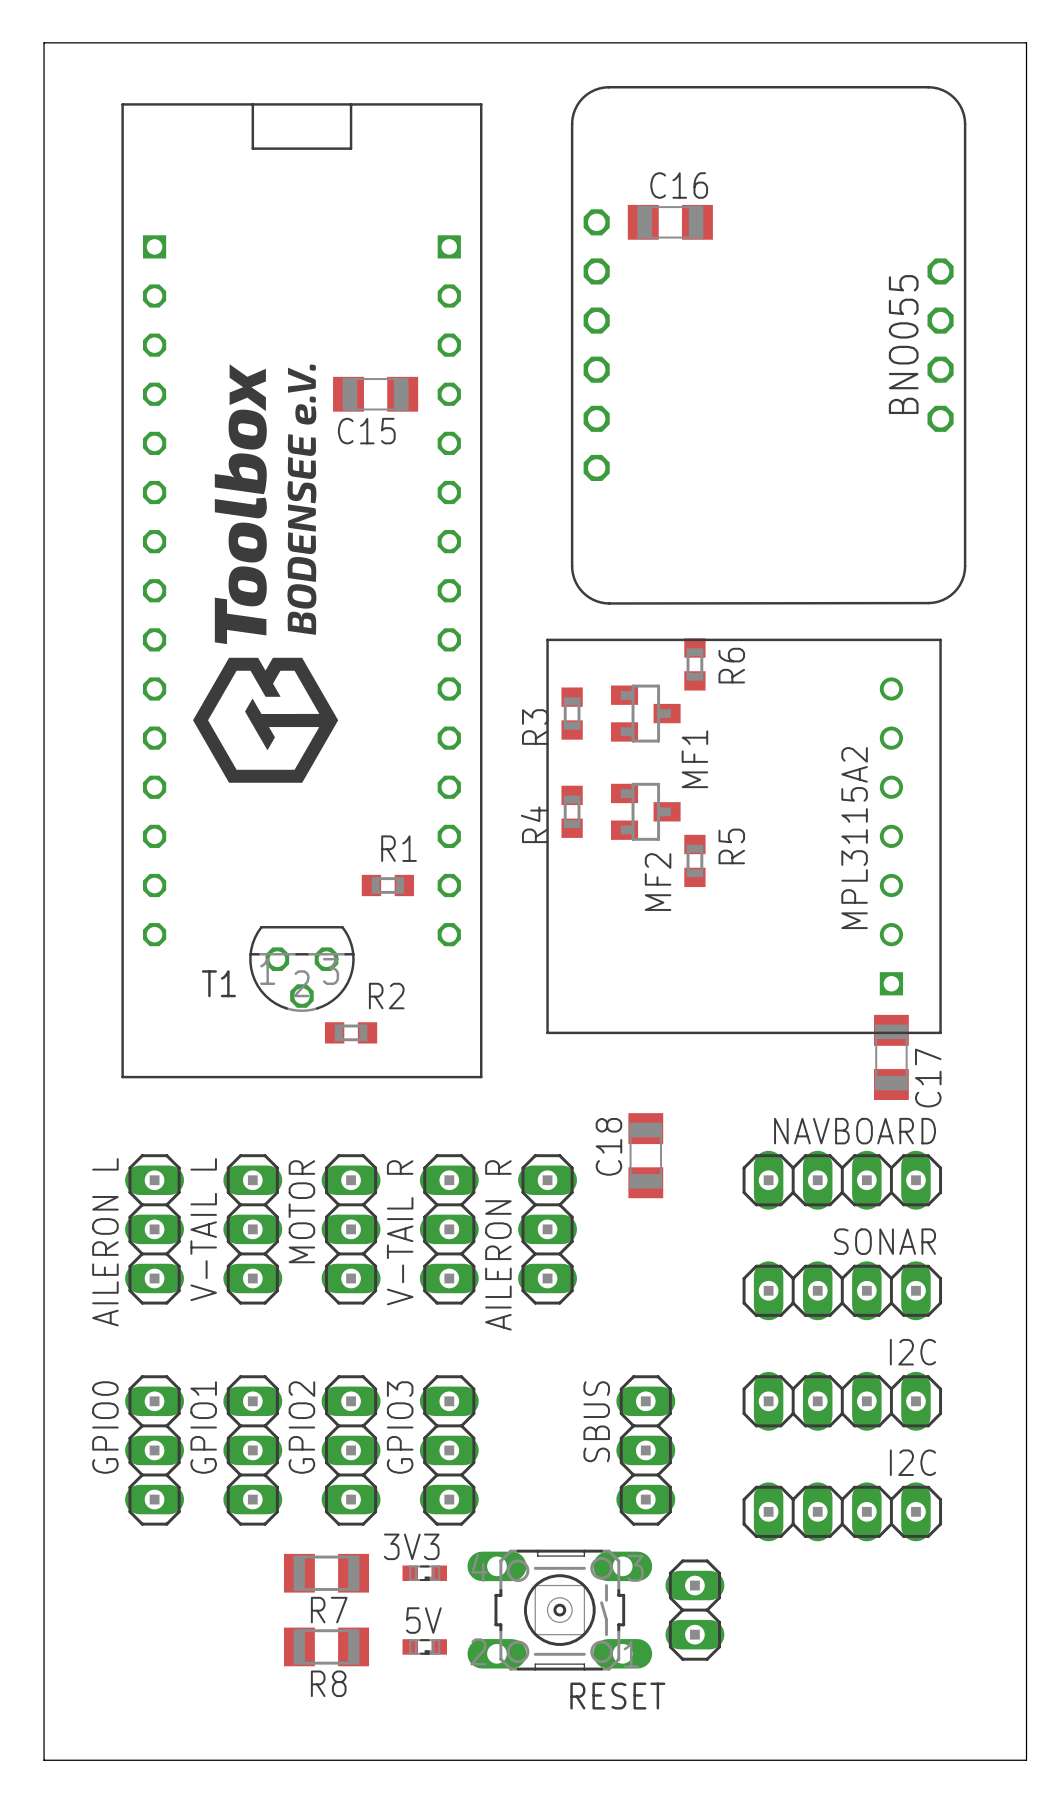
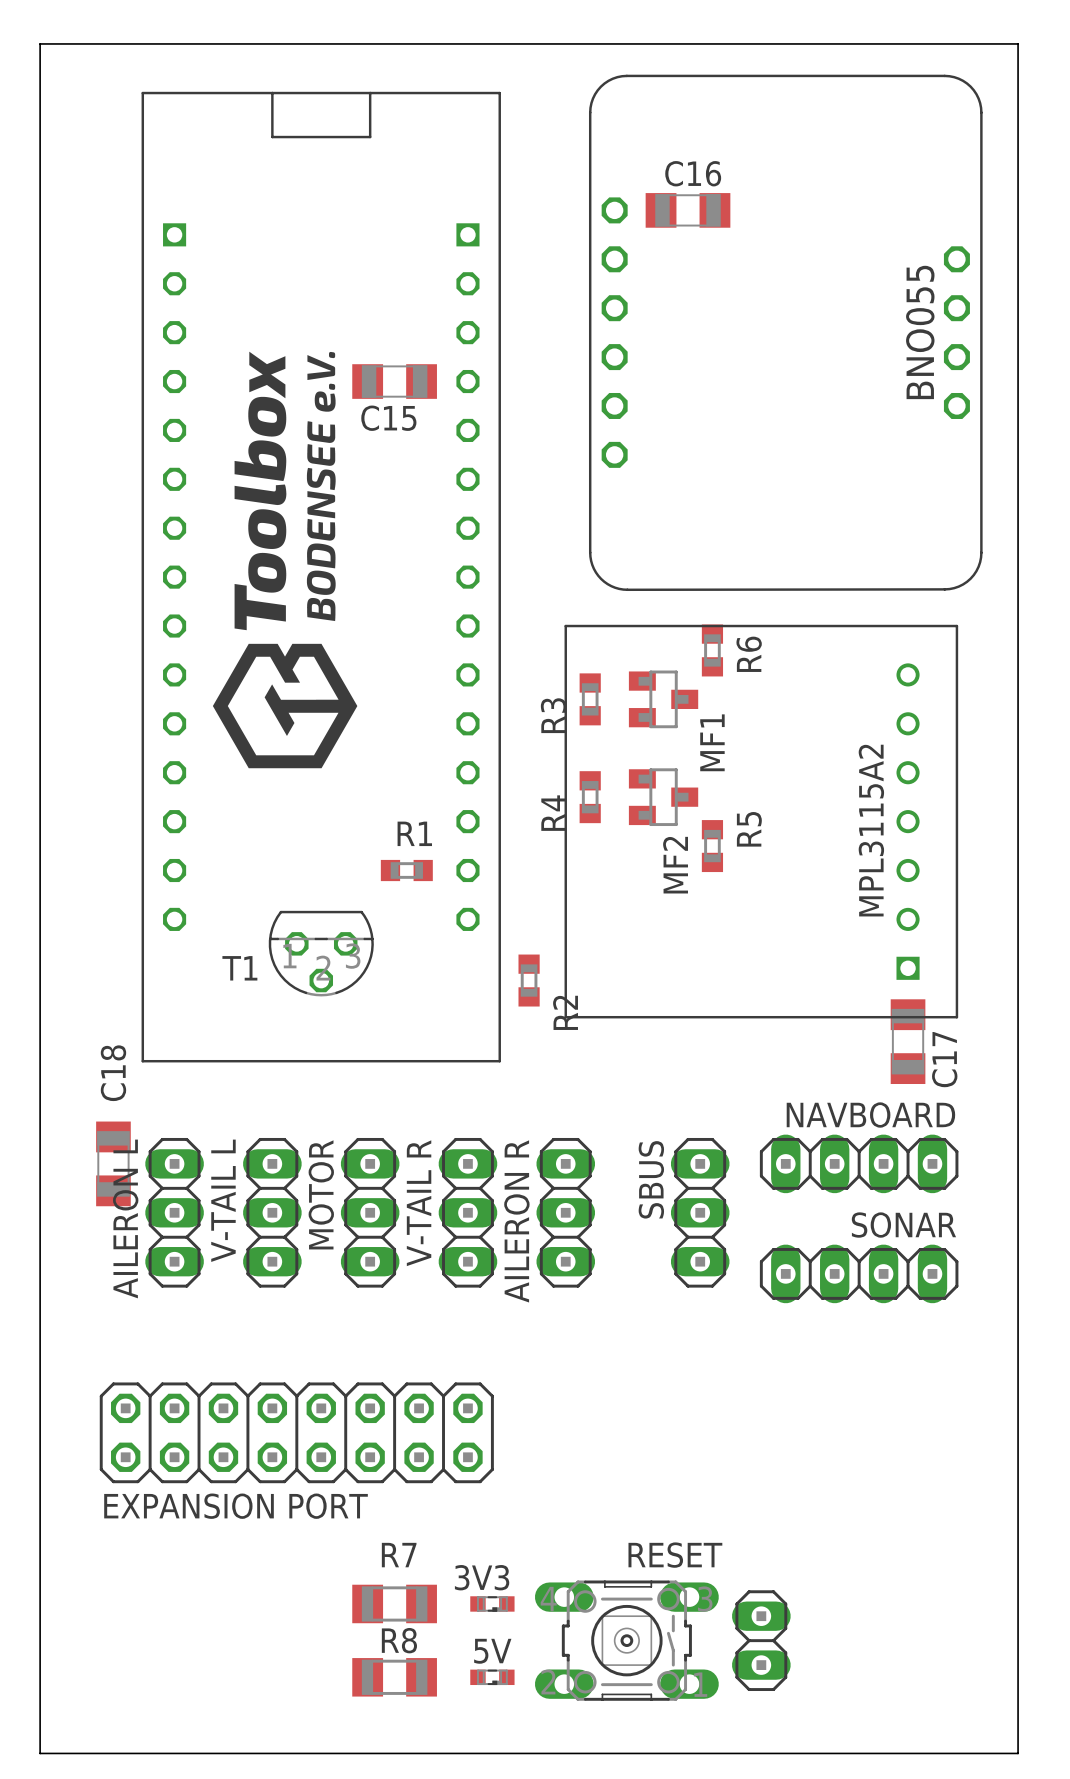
board edge: (44, 42) (1026, 42) (1026, 1760) (44, 1760) (44, 42) -> (40, 43) (1018, 43) (1018, 1753) (40, 1753) (40, 43)
R2 rotation: 0° (351, 1032) -> 90° clockwise (529, 980)
R2 position: (351, 1032) -> (529, 980)
C18 name position: C18 (608, 1146) -> C18 (113, 1073)
C18 position: (645, 1155) -> (113, 1163)
part: I2C (842, 1401) -> none
part: GPIO0 (154, 1450) -> none
part: GPIO1 (252, 1450) -> none
part: none -> EXPANSION PORT (296, 1432)
part: GPIO2 (351, 1450) -> none
part: GPIO3 (449, 1450) -> none
part position: (645, 1450) -> (700, 1212)
part: I2C (842, 1511) -> none
R7 position: (326, 1573) -> (394, 1603)
part position: (424, 1573) -> (492, 1603)
R7 name position: R7 (329, 1610) -> R7 (399, 1555)
part position: (559, 1610) -> (626, 1640)
part position: (694, 1610) -> (761, 1640)
R8 position: (326, 1646) -> (394, 1677)
part position: (424, 1646) -> (492, 1677)
R8 name position: R8 (328, 1683) -> R8 (399, 1640)
part value position: RESET (617, 1696) -> RESET (675, 1555)

